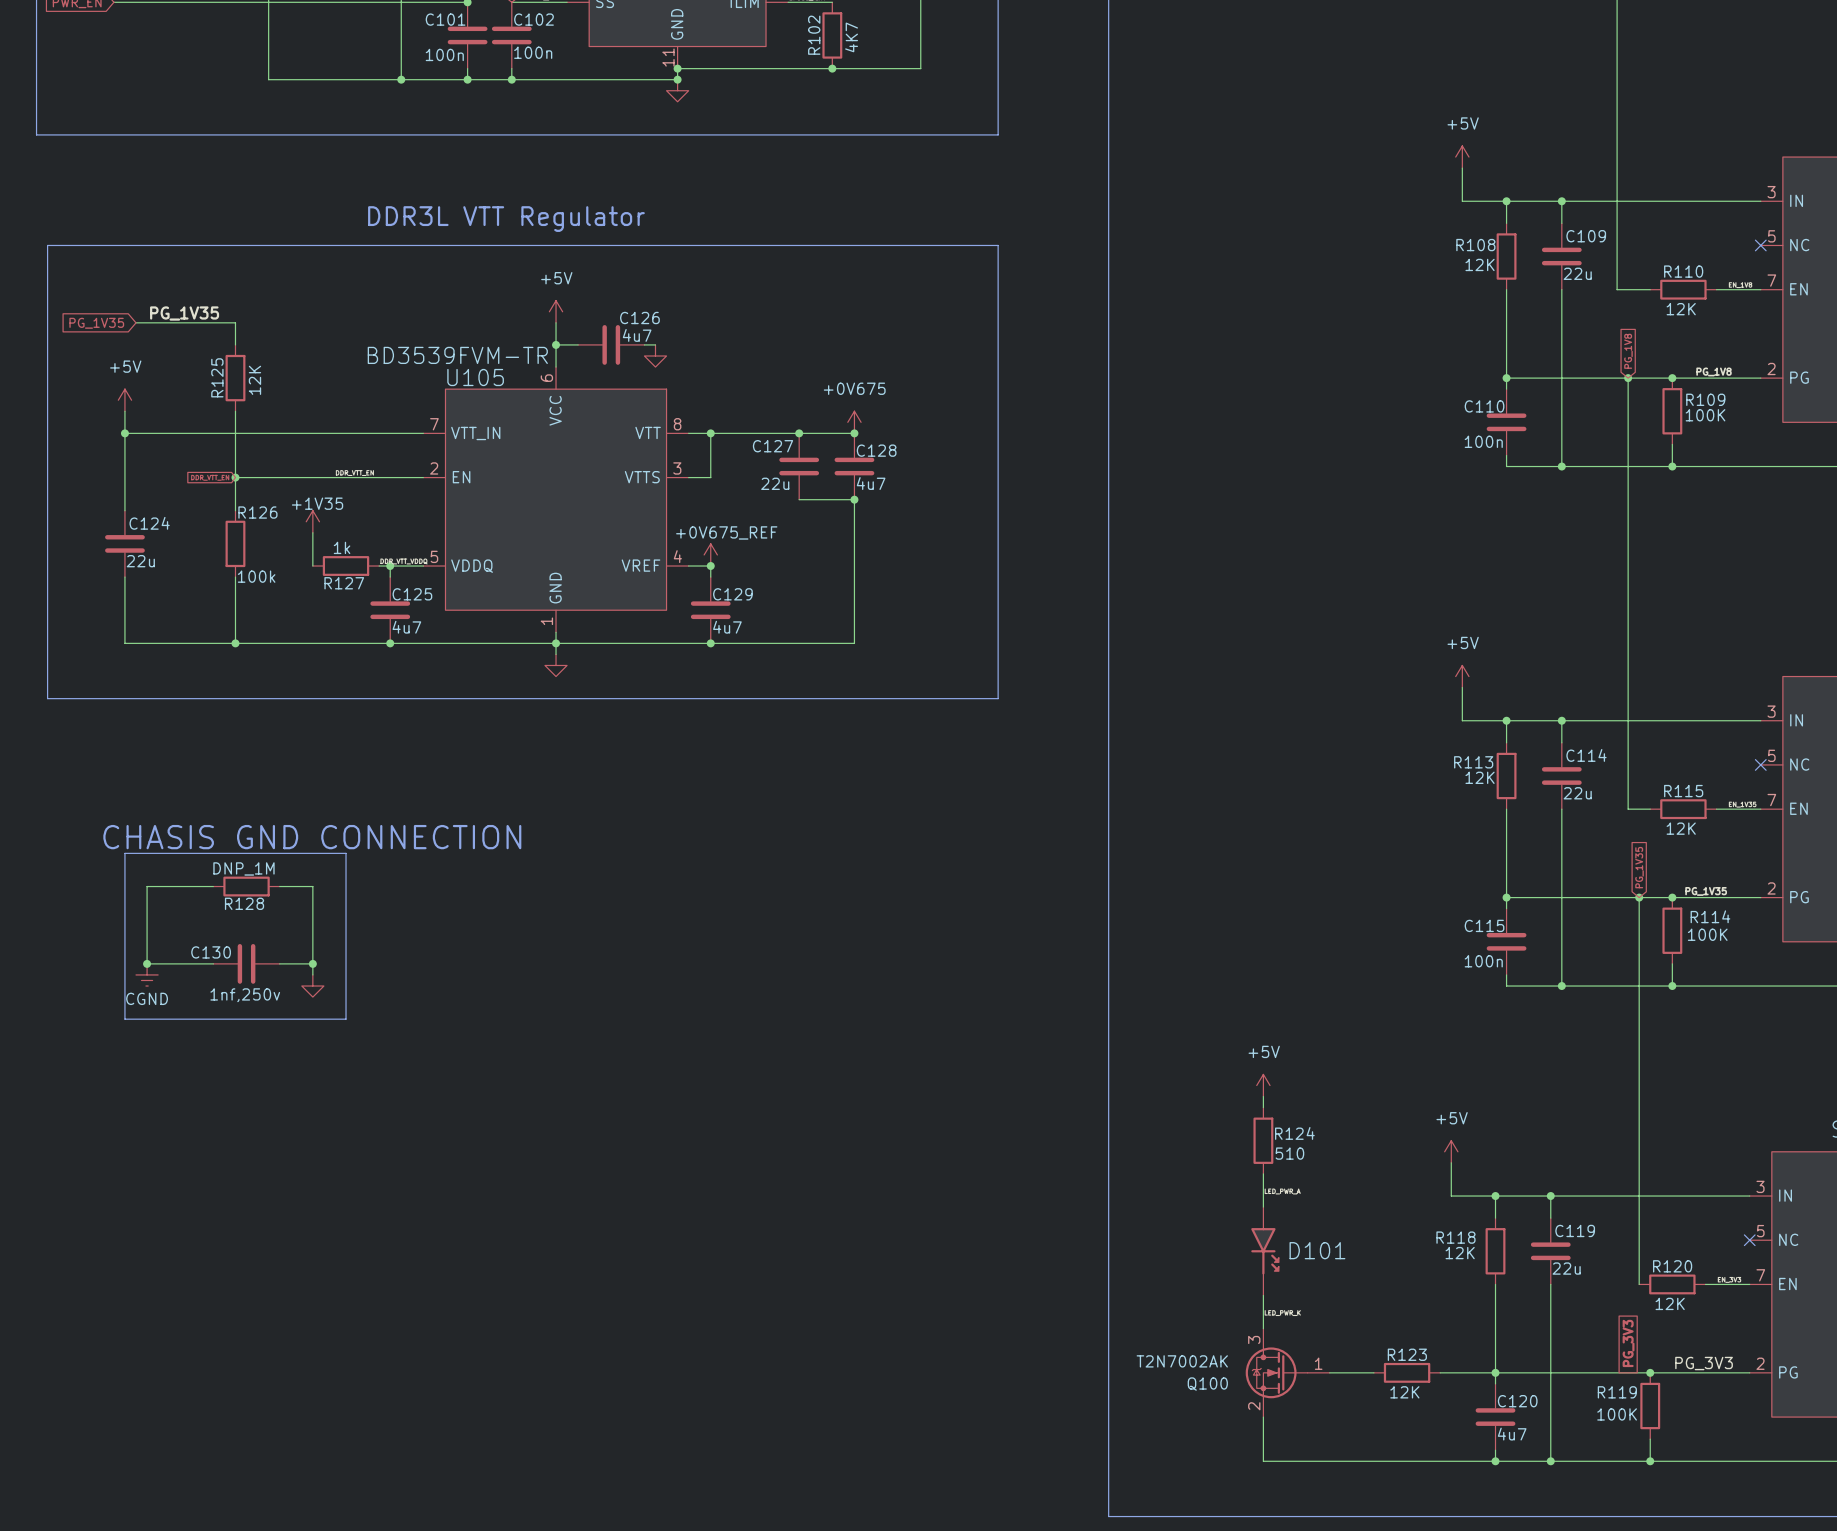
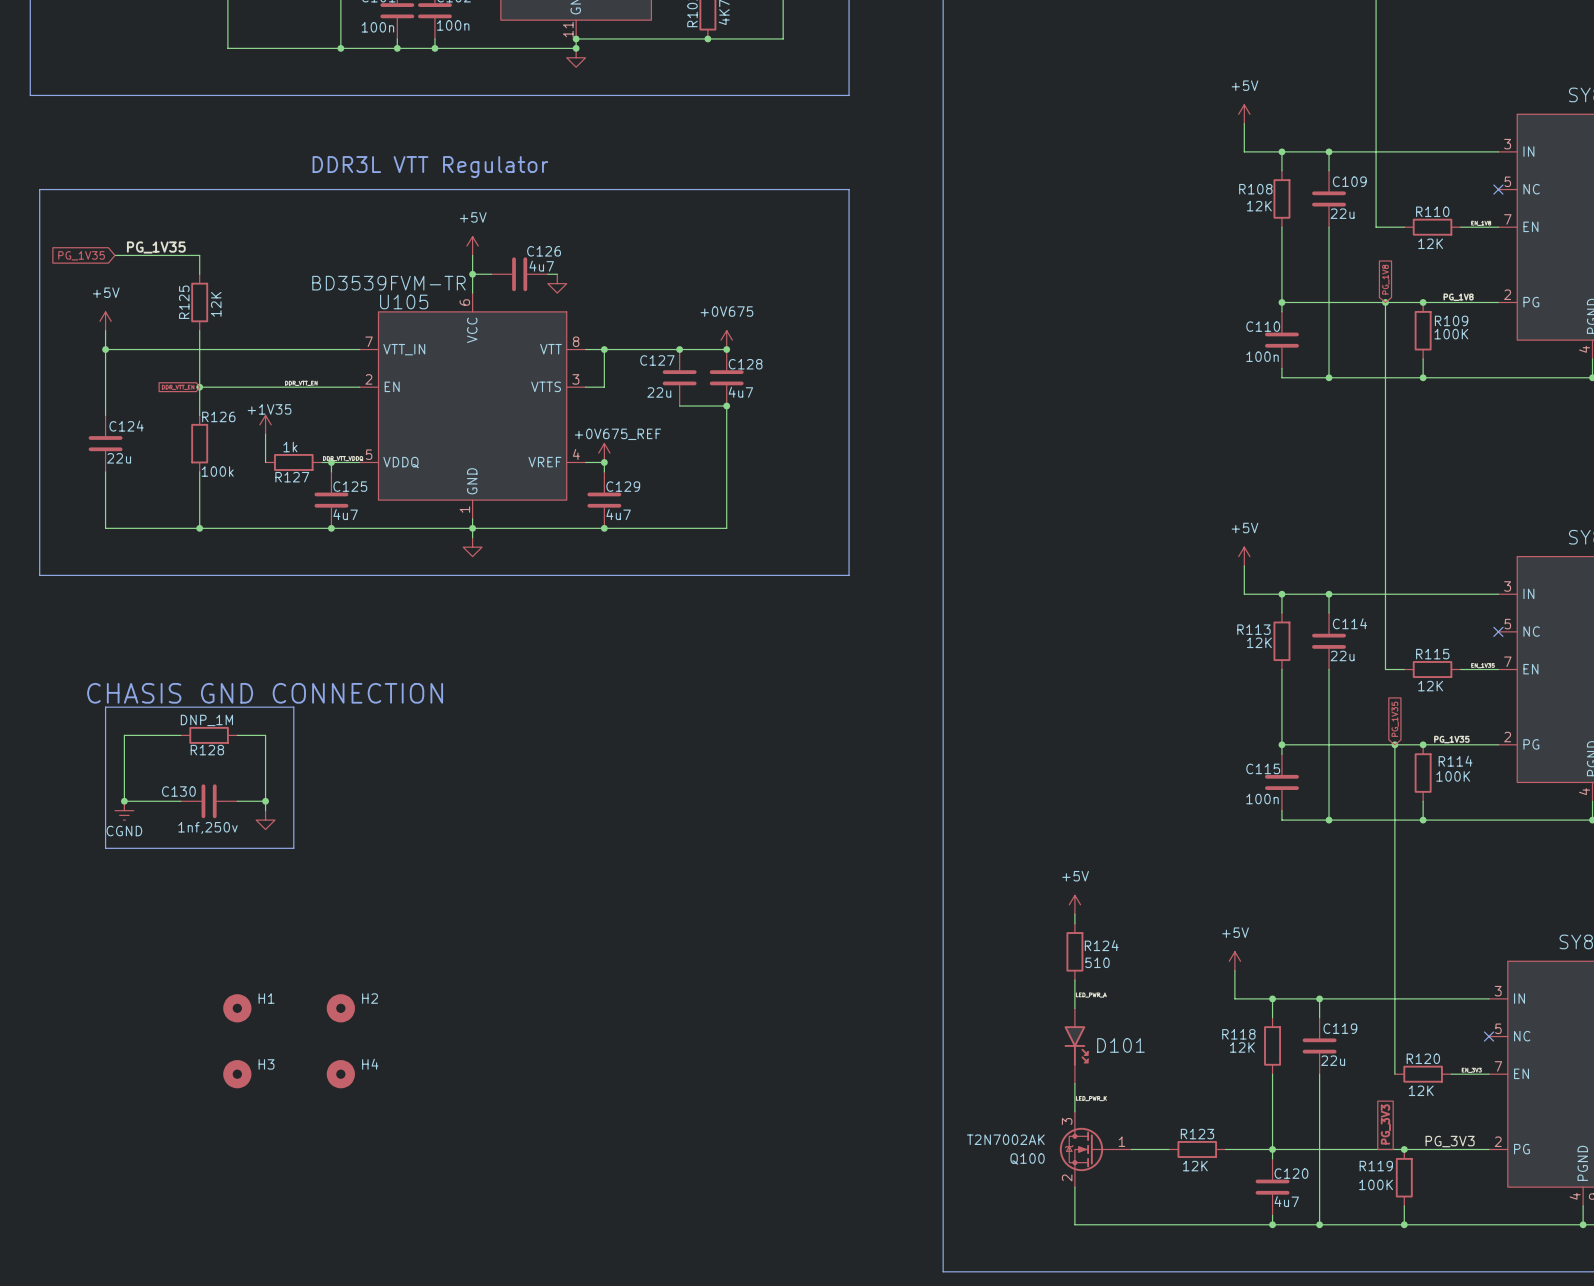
H1: none -> (237, 1008)
H2: none -> (340, 1008)
H3: none -> (237, 1074)
H4: none -> (340, 1074)

